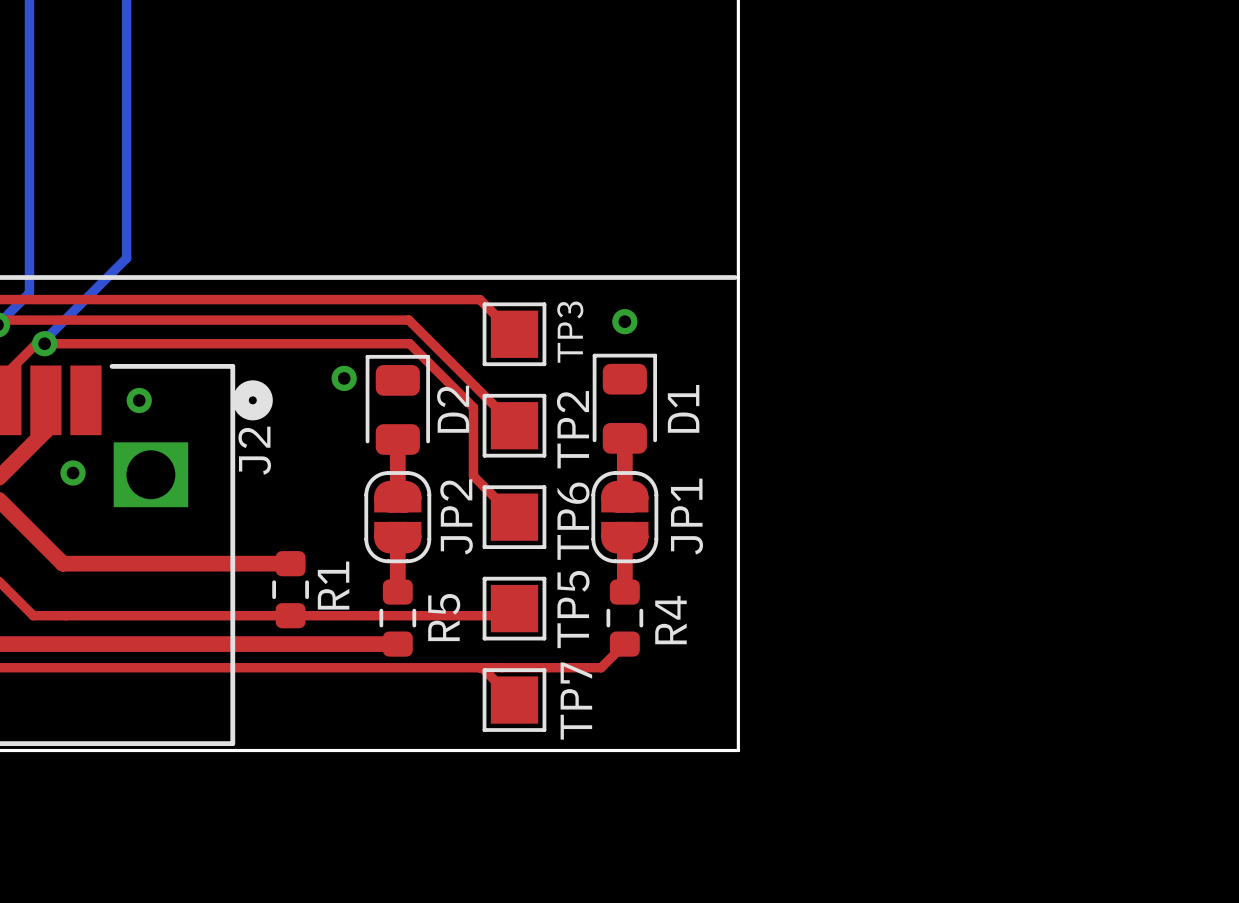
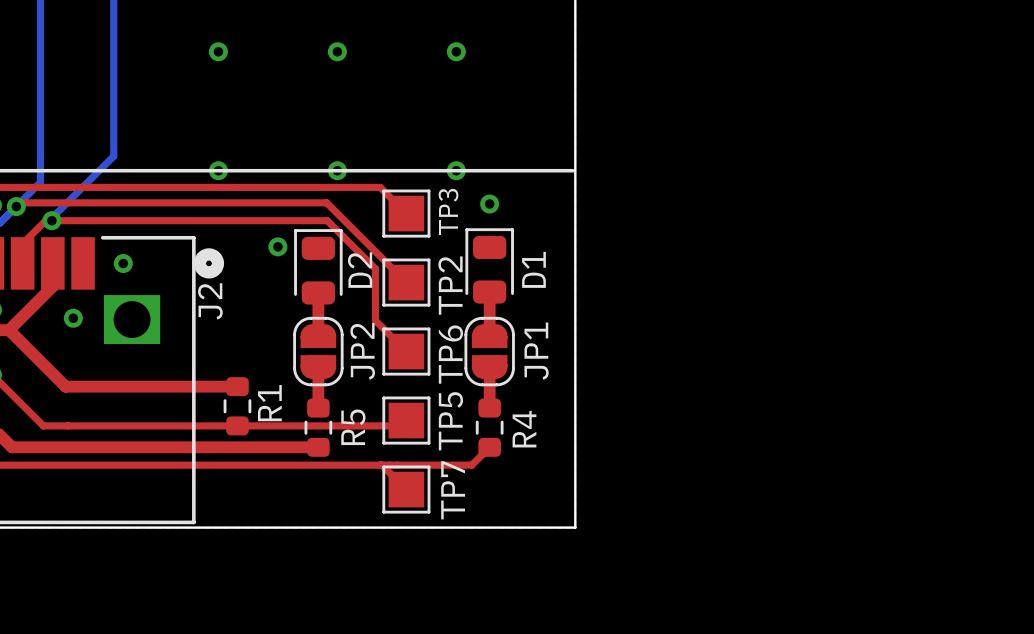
via: none -> (218, 51)
via: none -> (337, 51)
via: none -> (456, 51)
via: none -> (218, 170)
via: none -> (337, 170)
via: none -> (456, 170)

